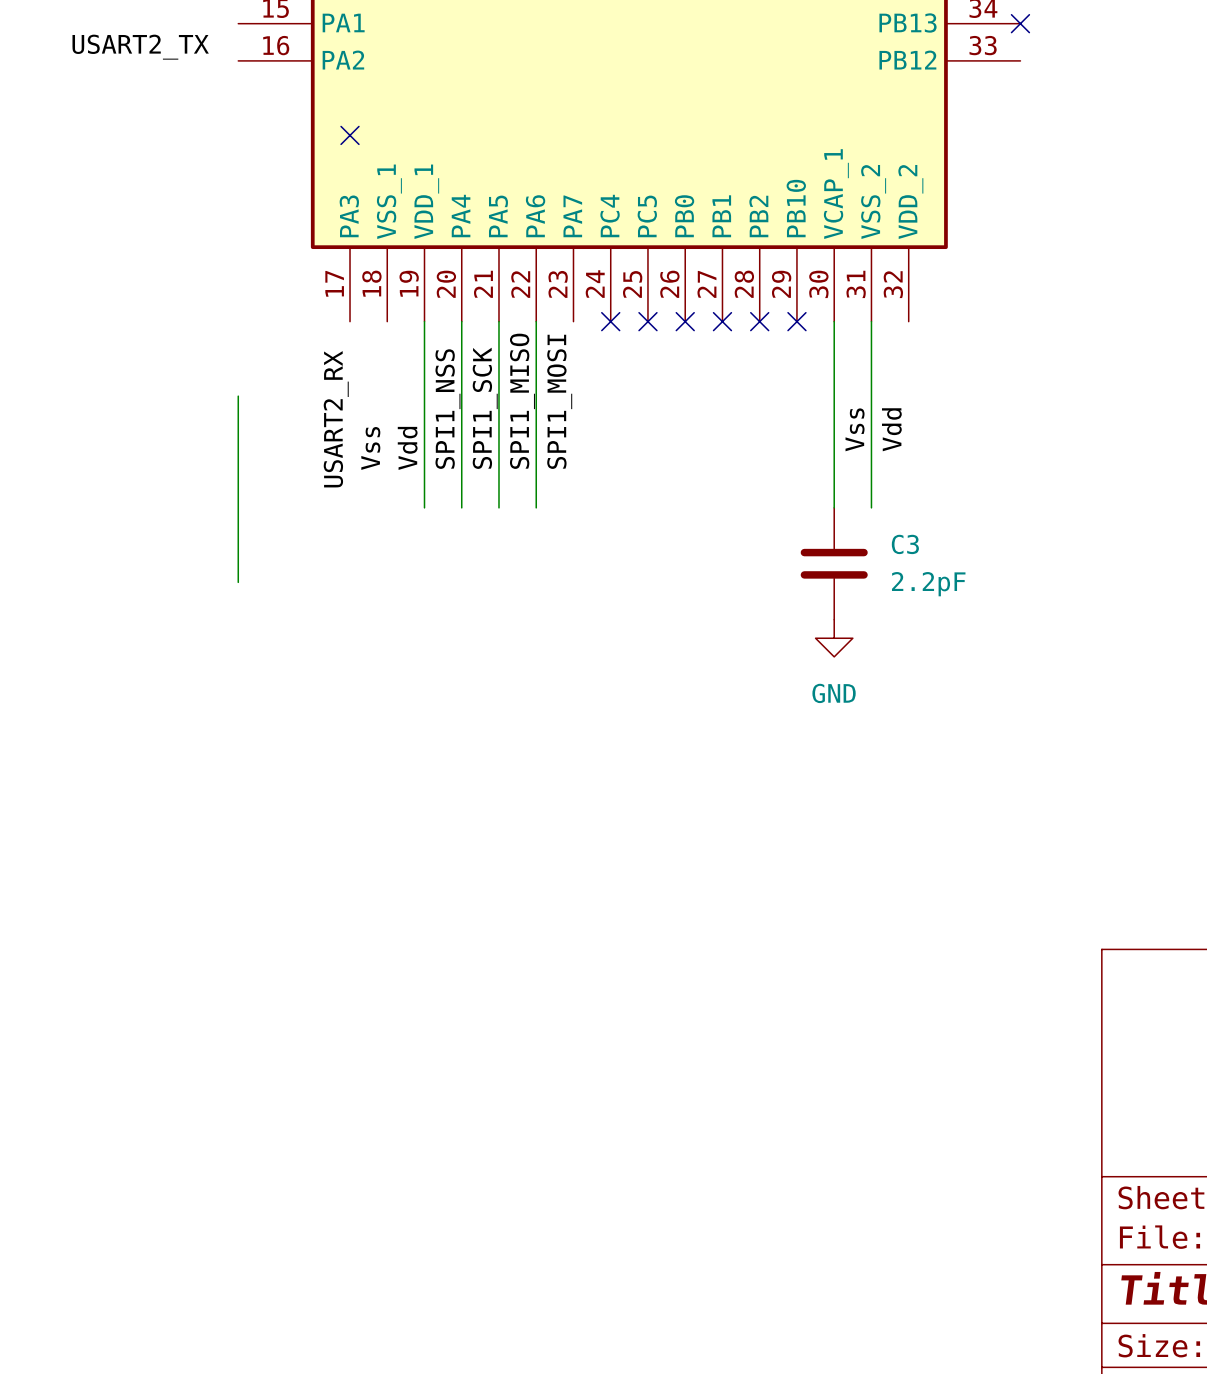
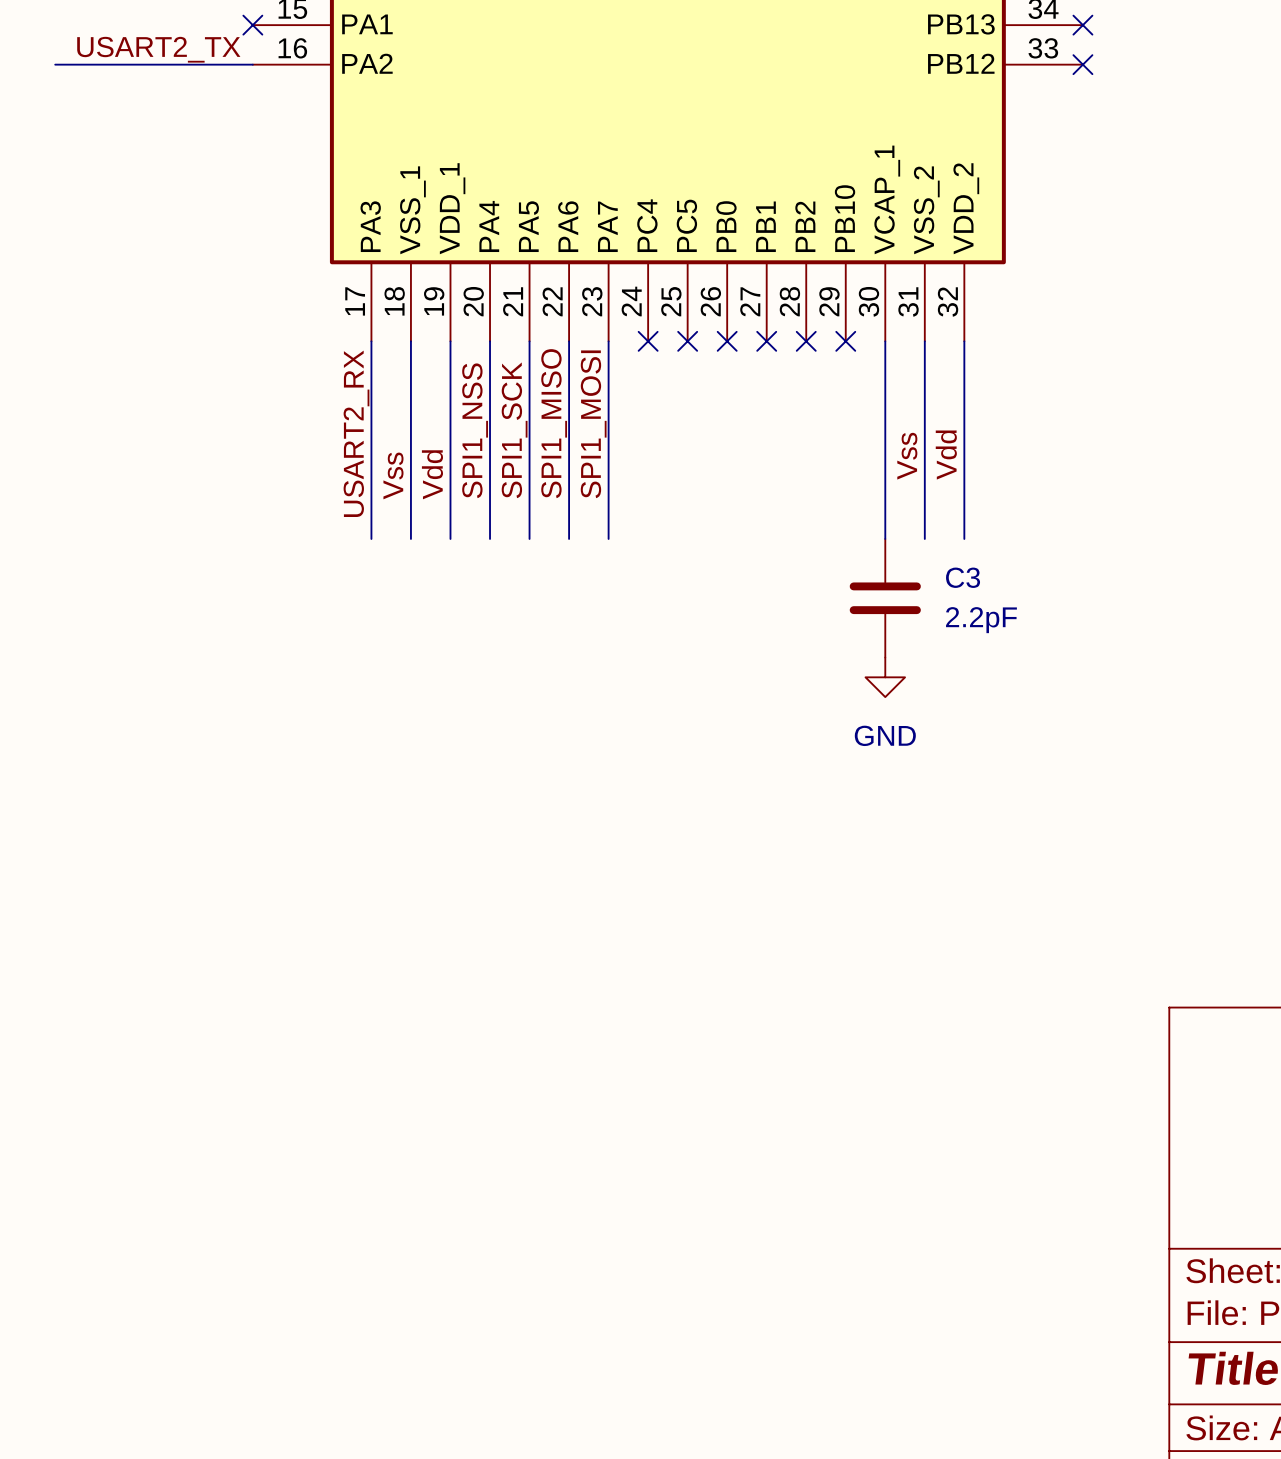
no-connect mark: none -> (252, 25)
wire: none -> (55, 64) (252, 64)
no-connect mark: none -> (1082, 64)
no-connect mark: (350, 135) -> none
wire: none -> (410, 341) (410, 538)
wire: none -> (608, 341) (608, 538)
wire: none -> (964, 341) (964, 538)
wire: (238, 396) (238, 582) -> (371, 341) (371, 538)

